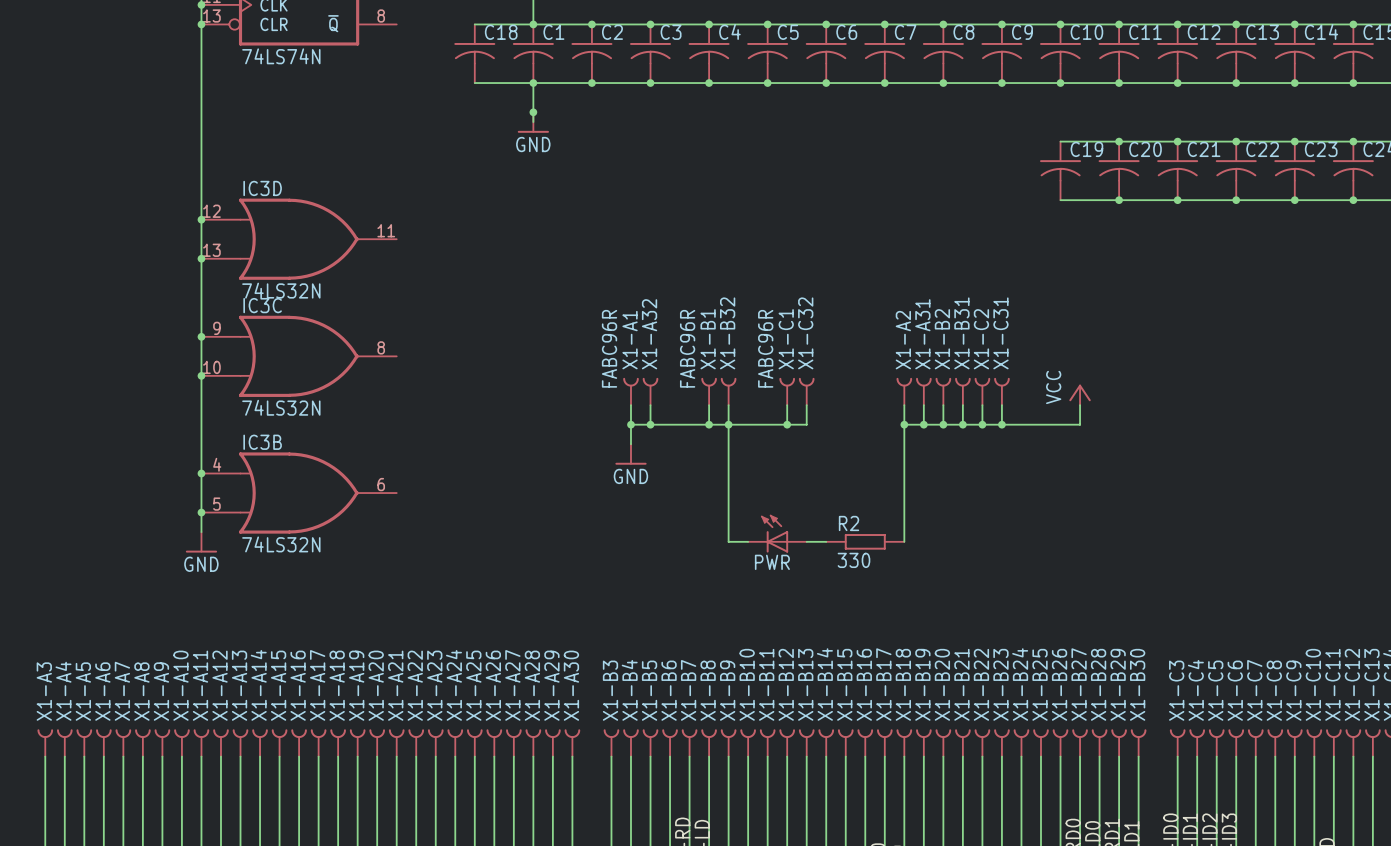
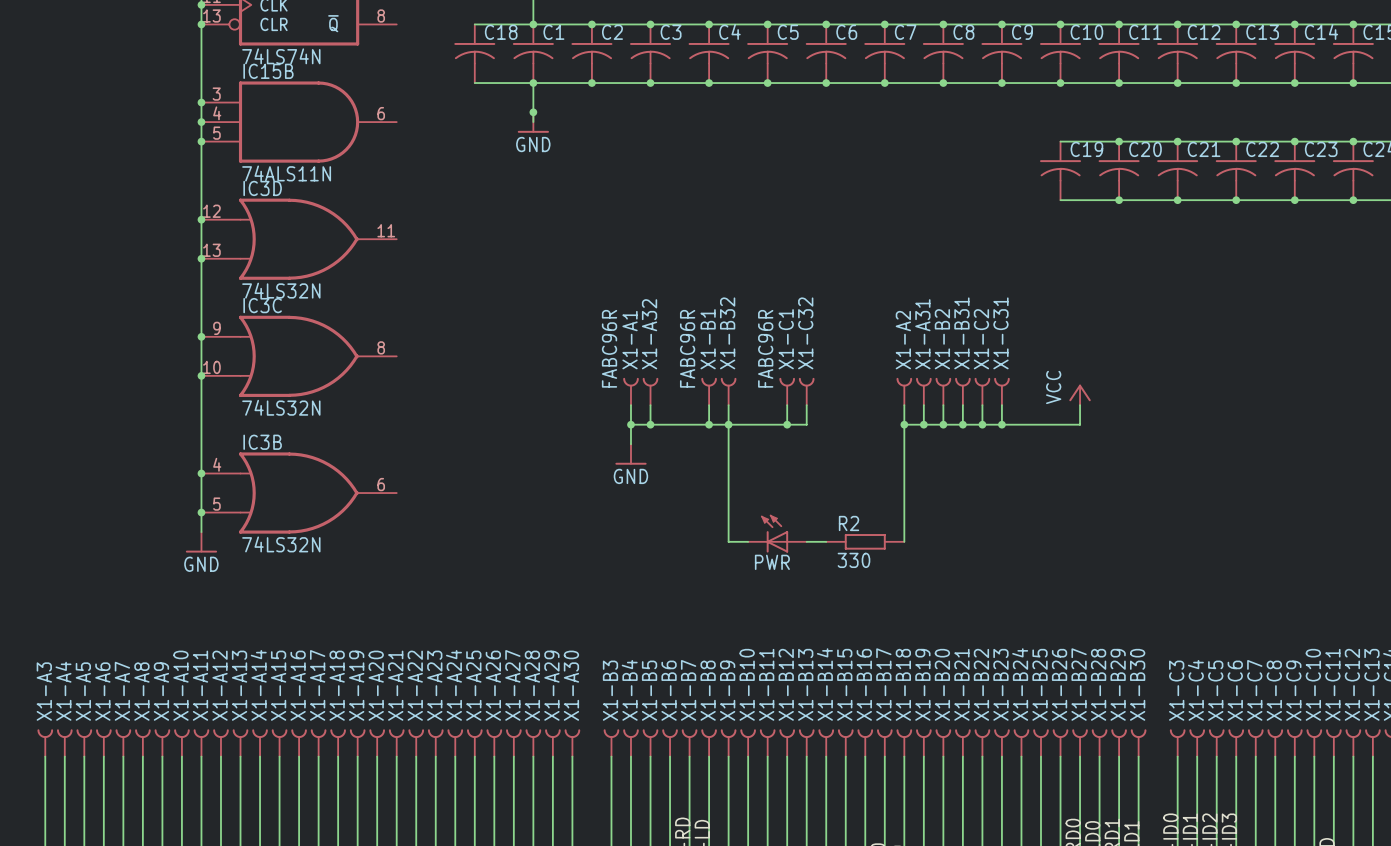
junction: none -> (201, 102)
junction: none -> (201, 122)
IC15B: none -> 74ALS11N (299, 122)
junction: none -> (201, 141)

